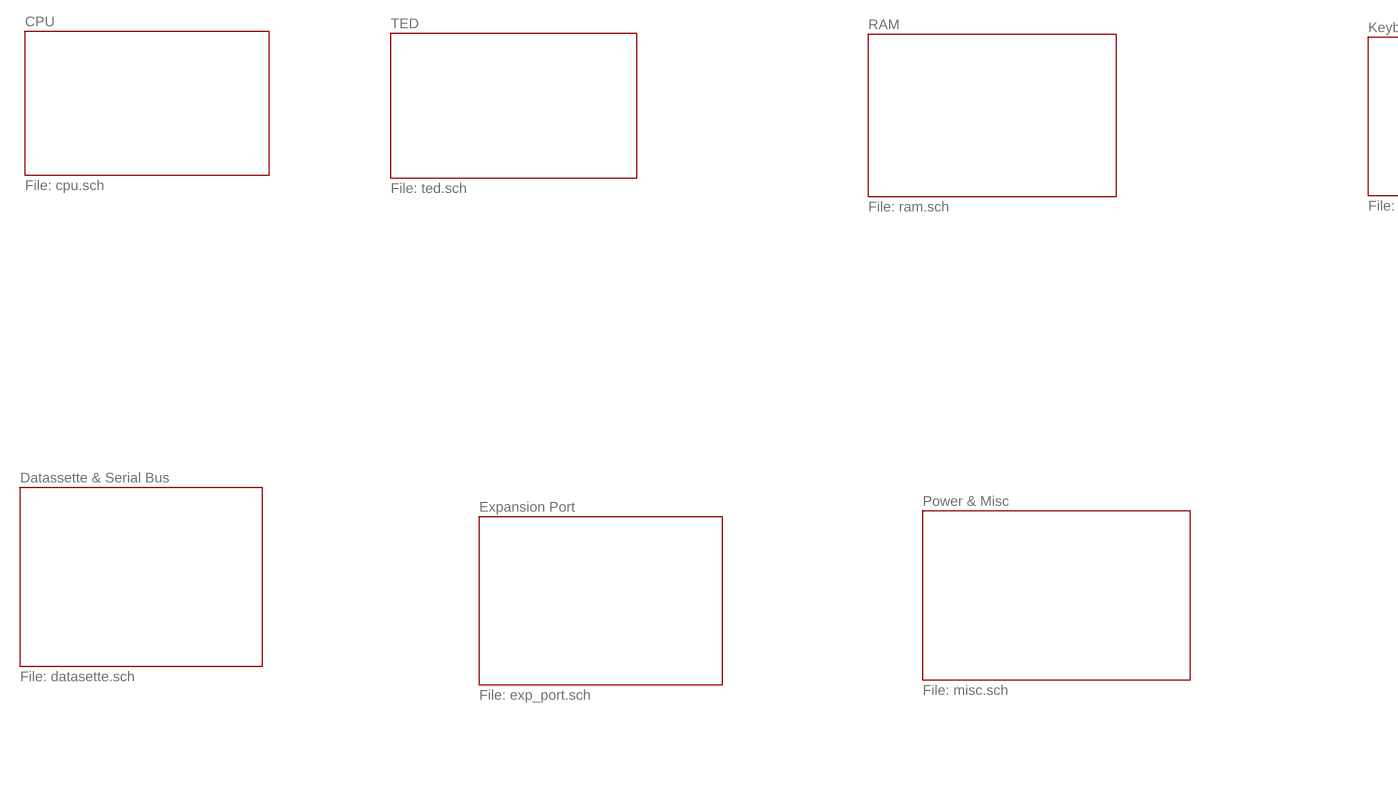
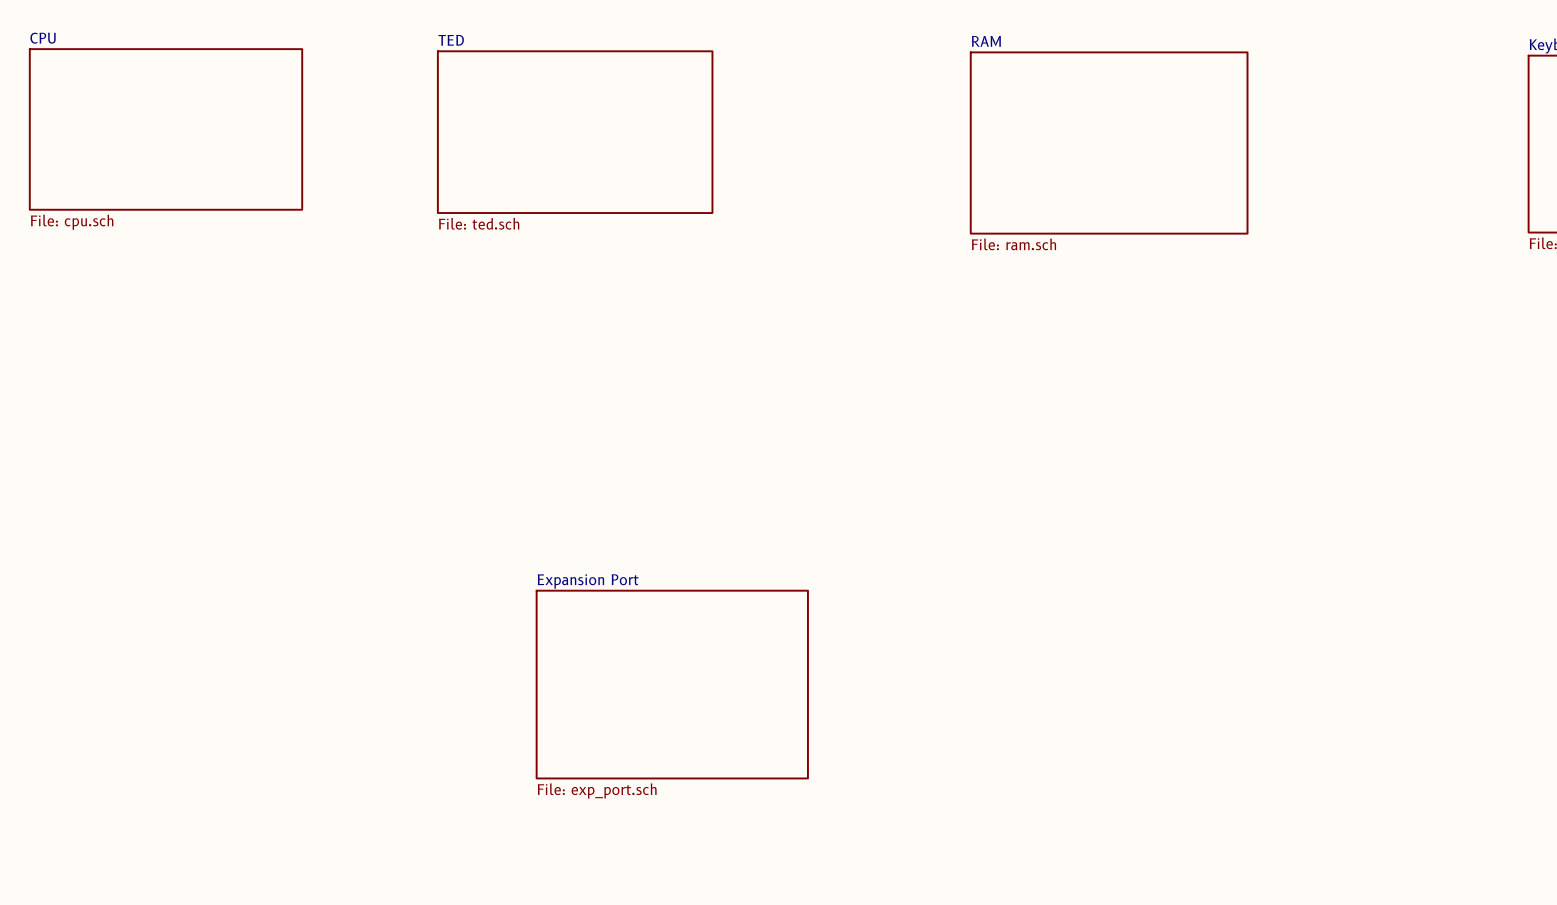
sheet Datassette & Serial Bus: File: datasette.sch (141, 576) -> none
sheet Power & Misc: File: misc.sch (1056, 595) -> none

